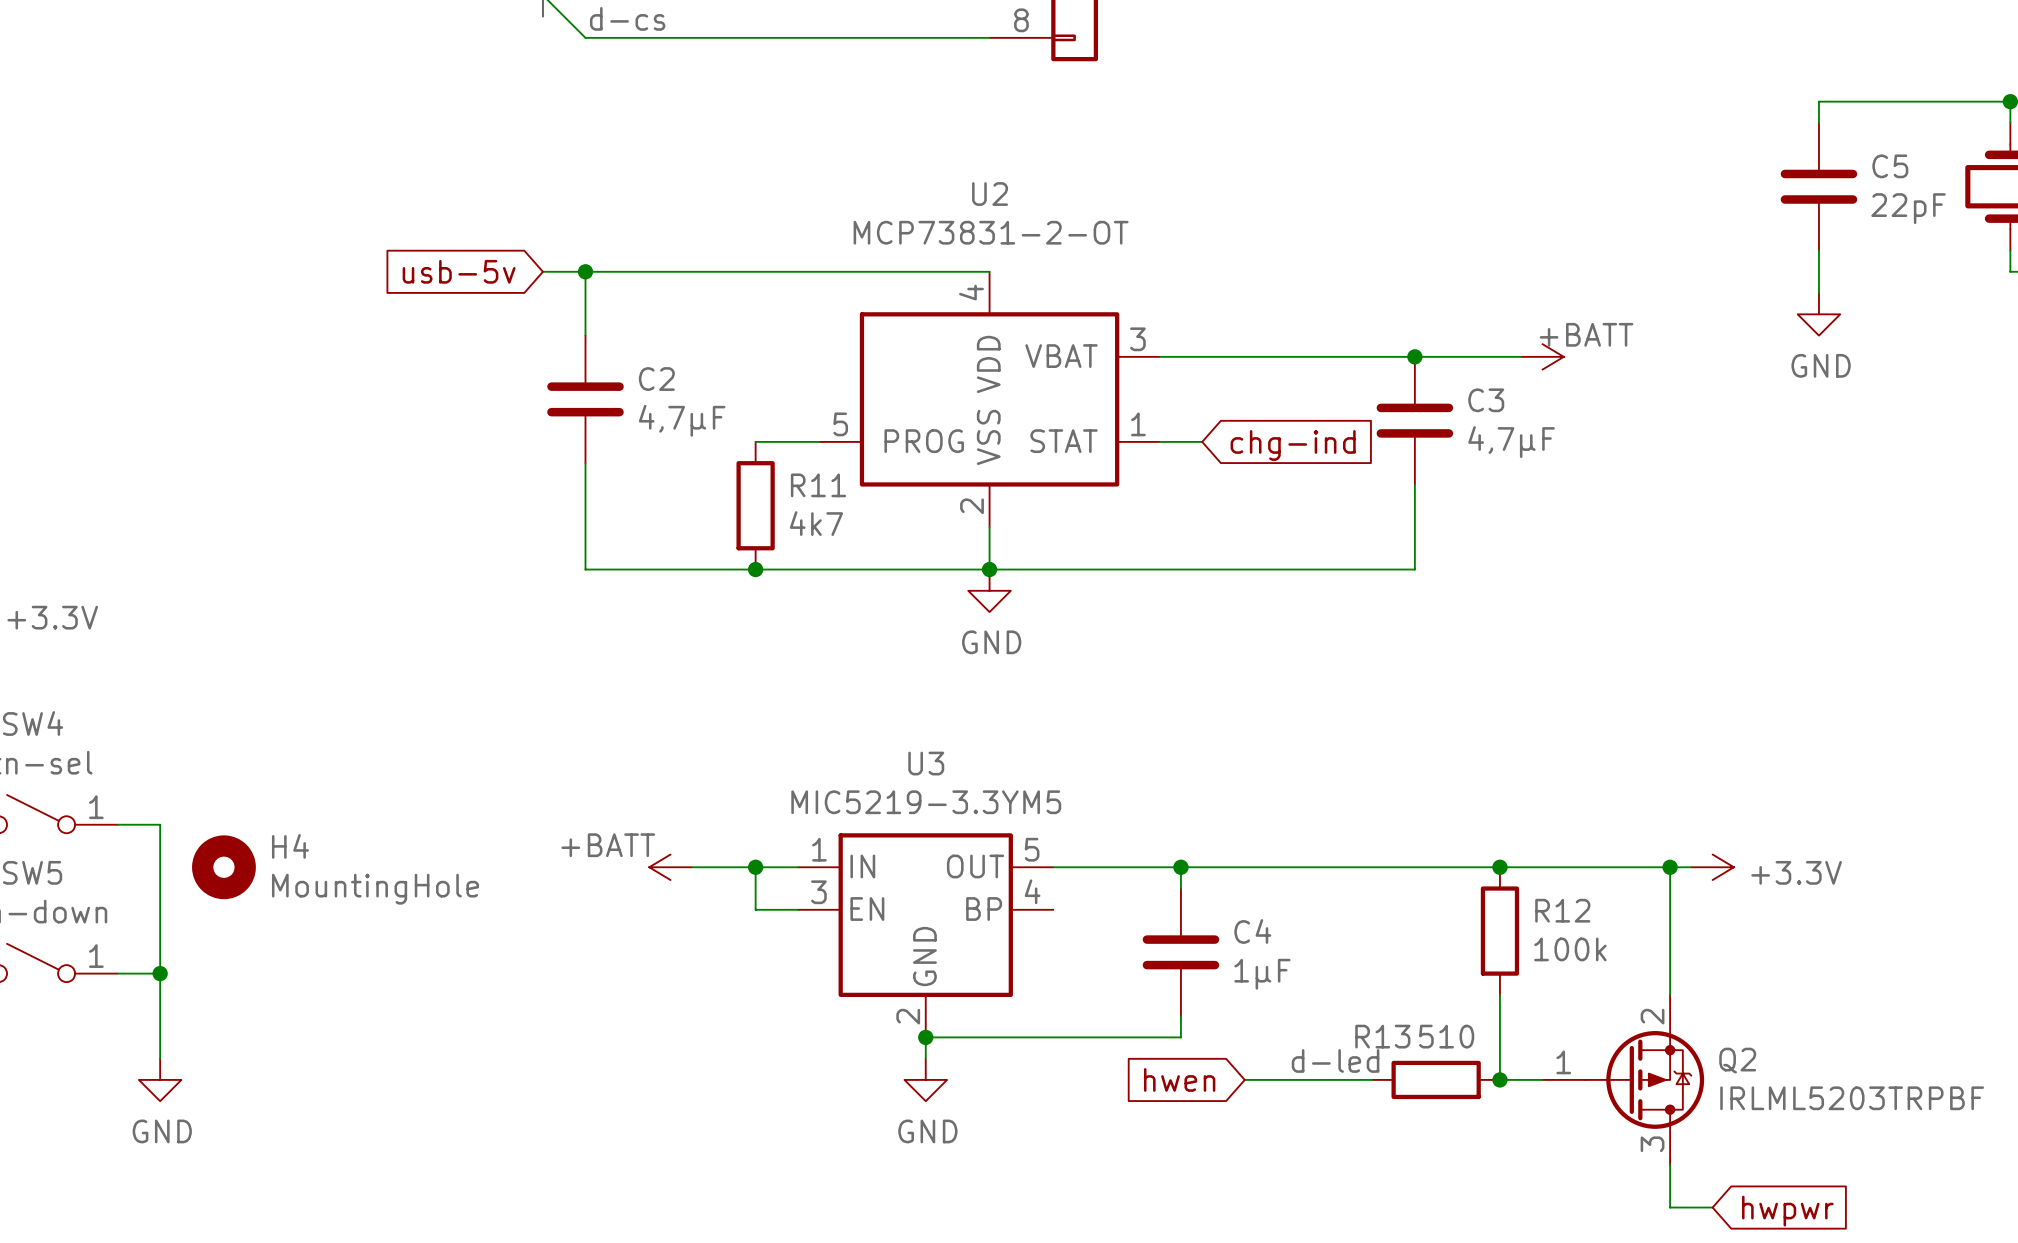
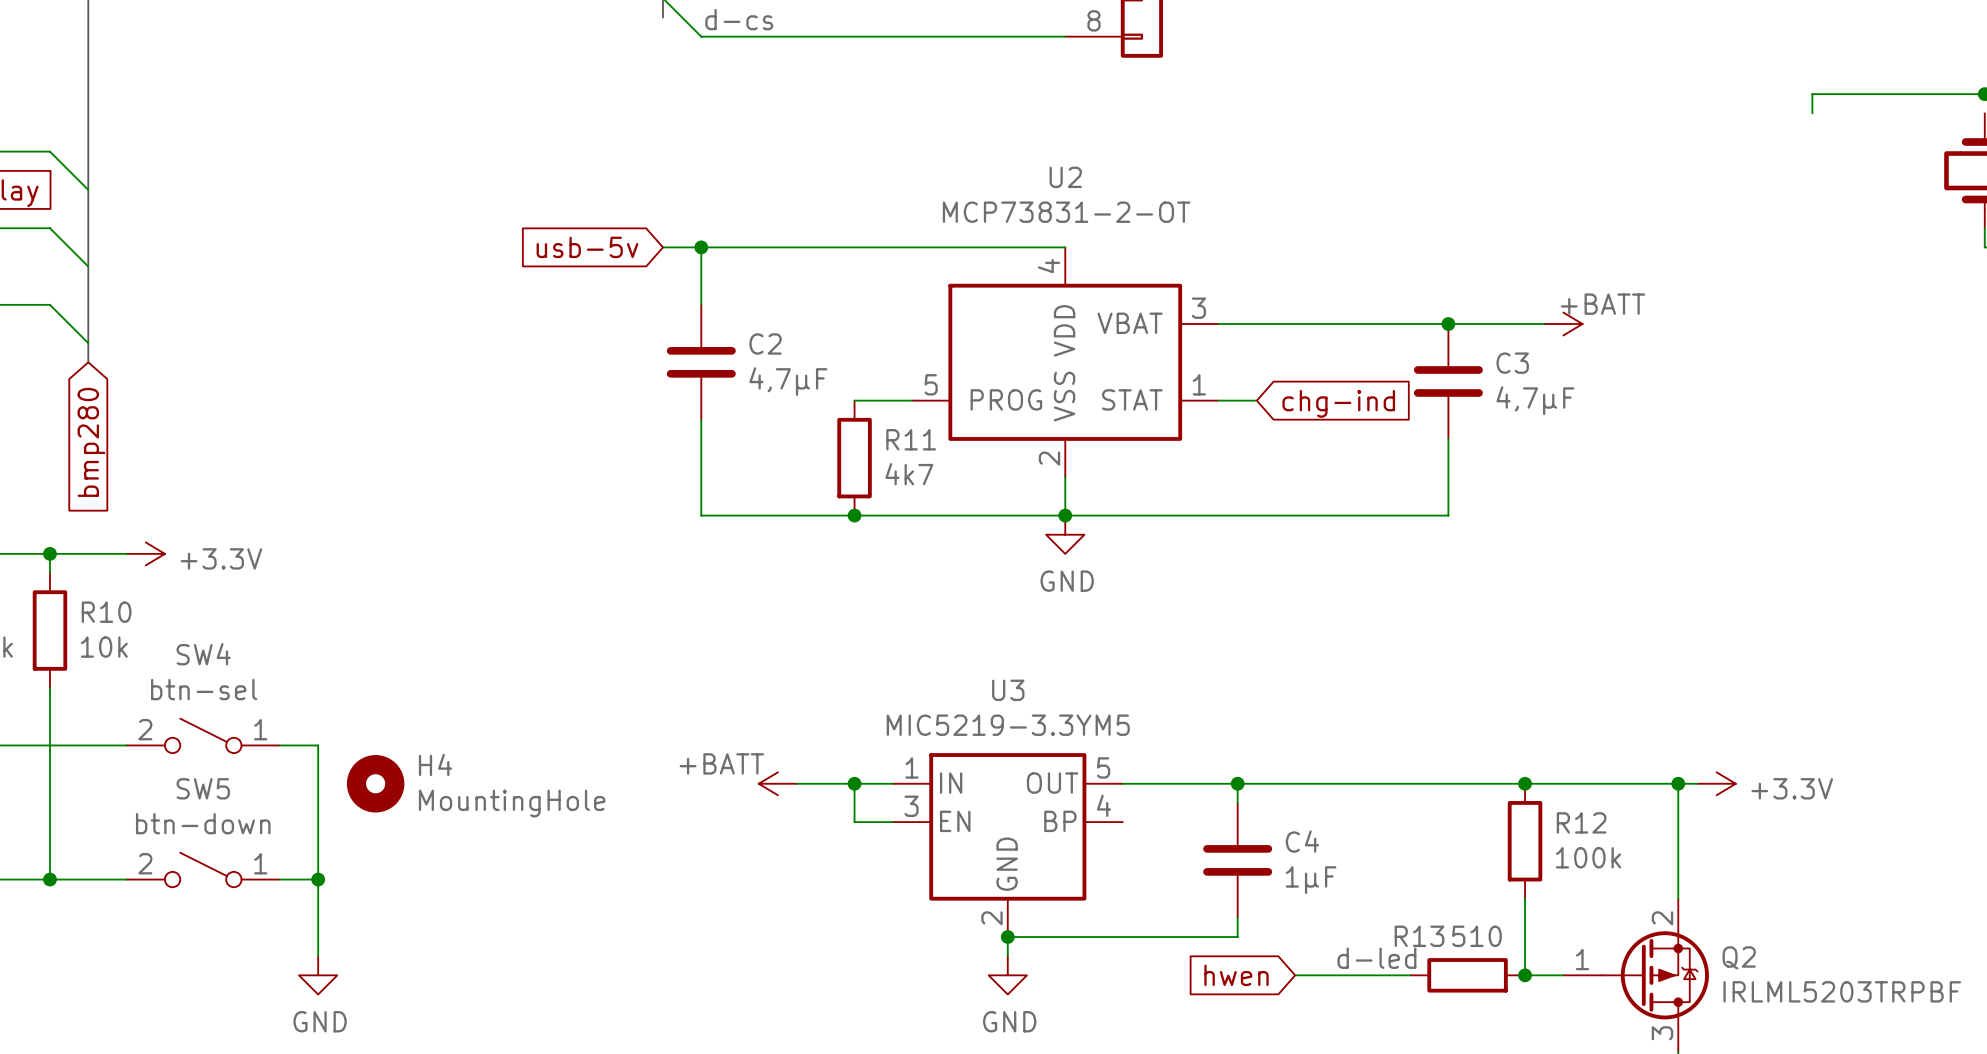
wire: (2010, 101) (2010, 122) -> none
C5: 22pF (1818, 186) -> none
wire: (1818, 250) (1818, 293) -> none
power symbol: GND (1818, 314) -> none

